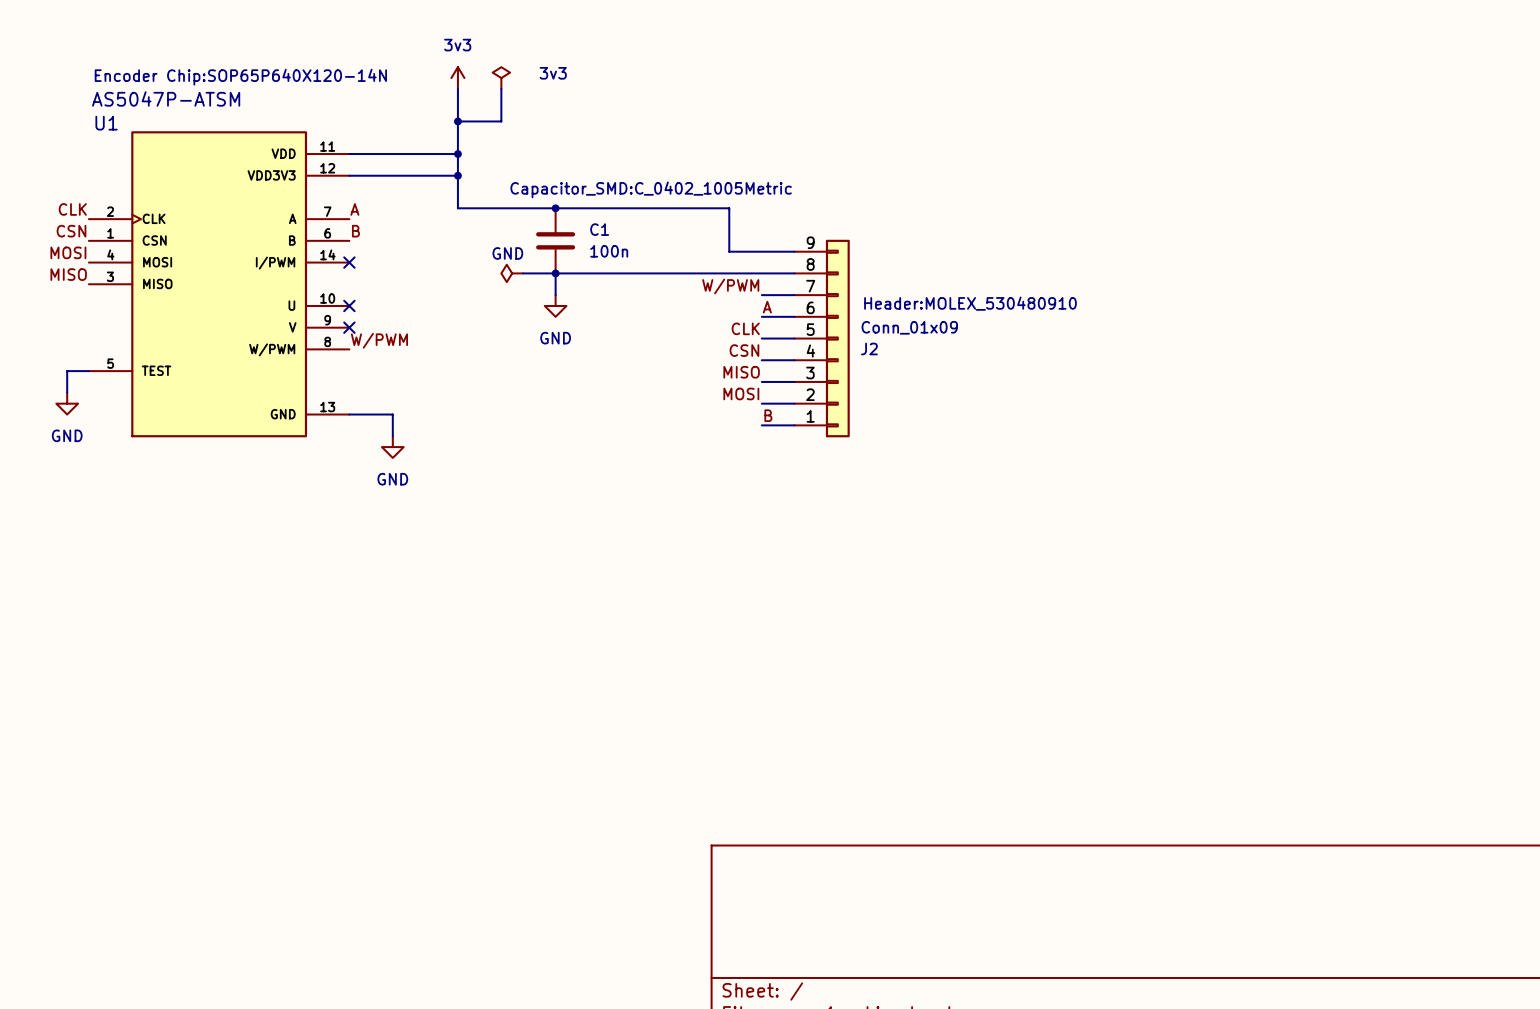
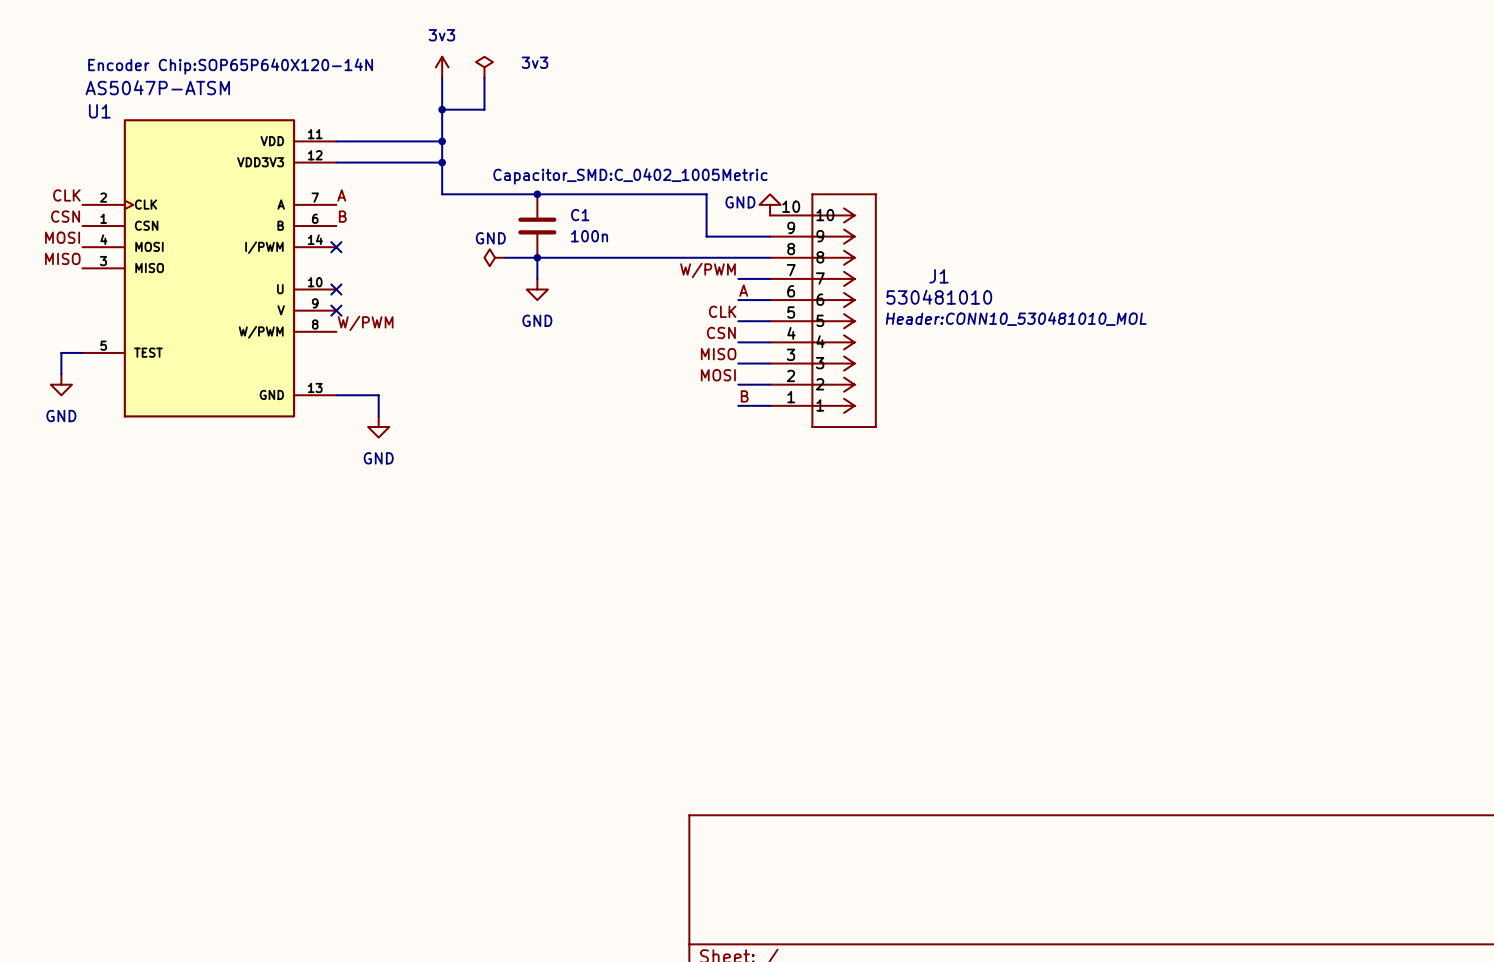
power symbol: none -> GND (770, 204)
J1: none -> 530481010 (823, 310)
J2: Conn_01x09 (822, 338) -> none

